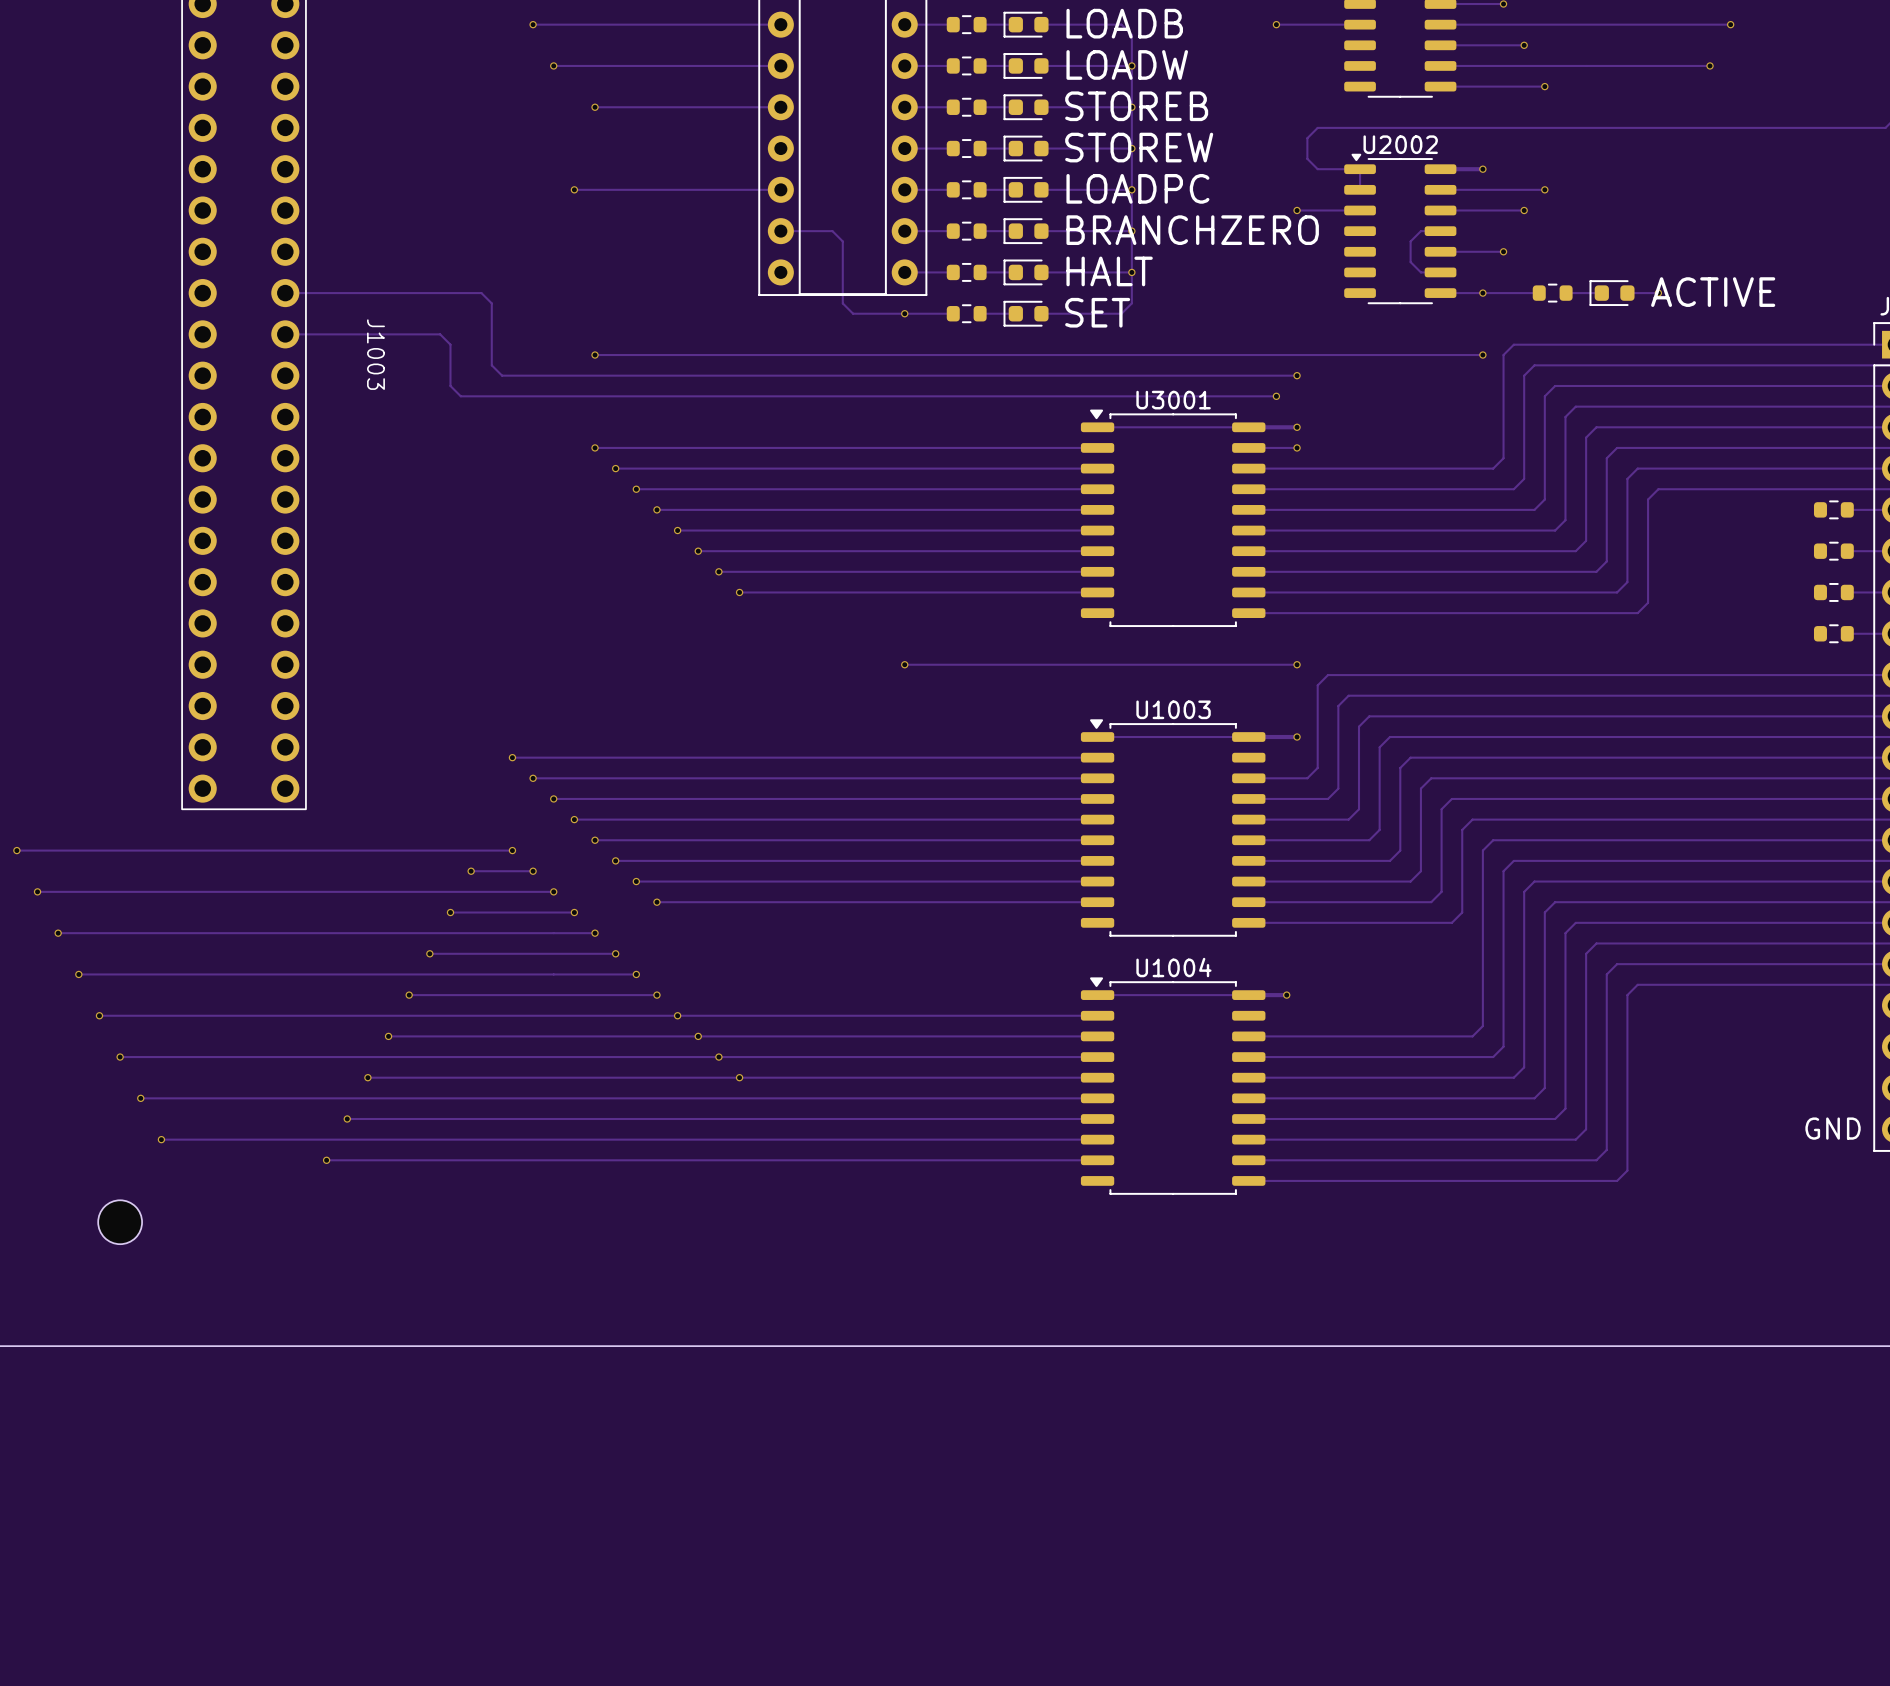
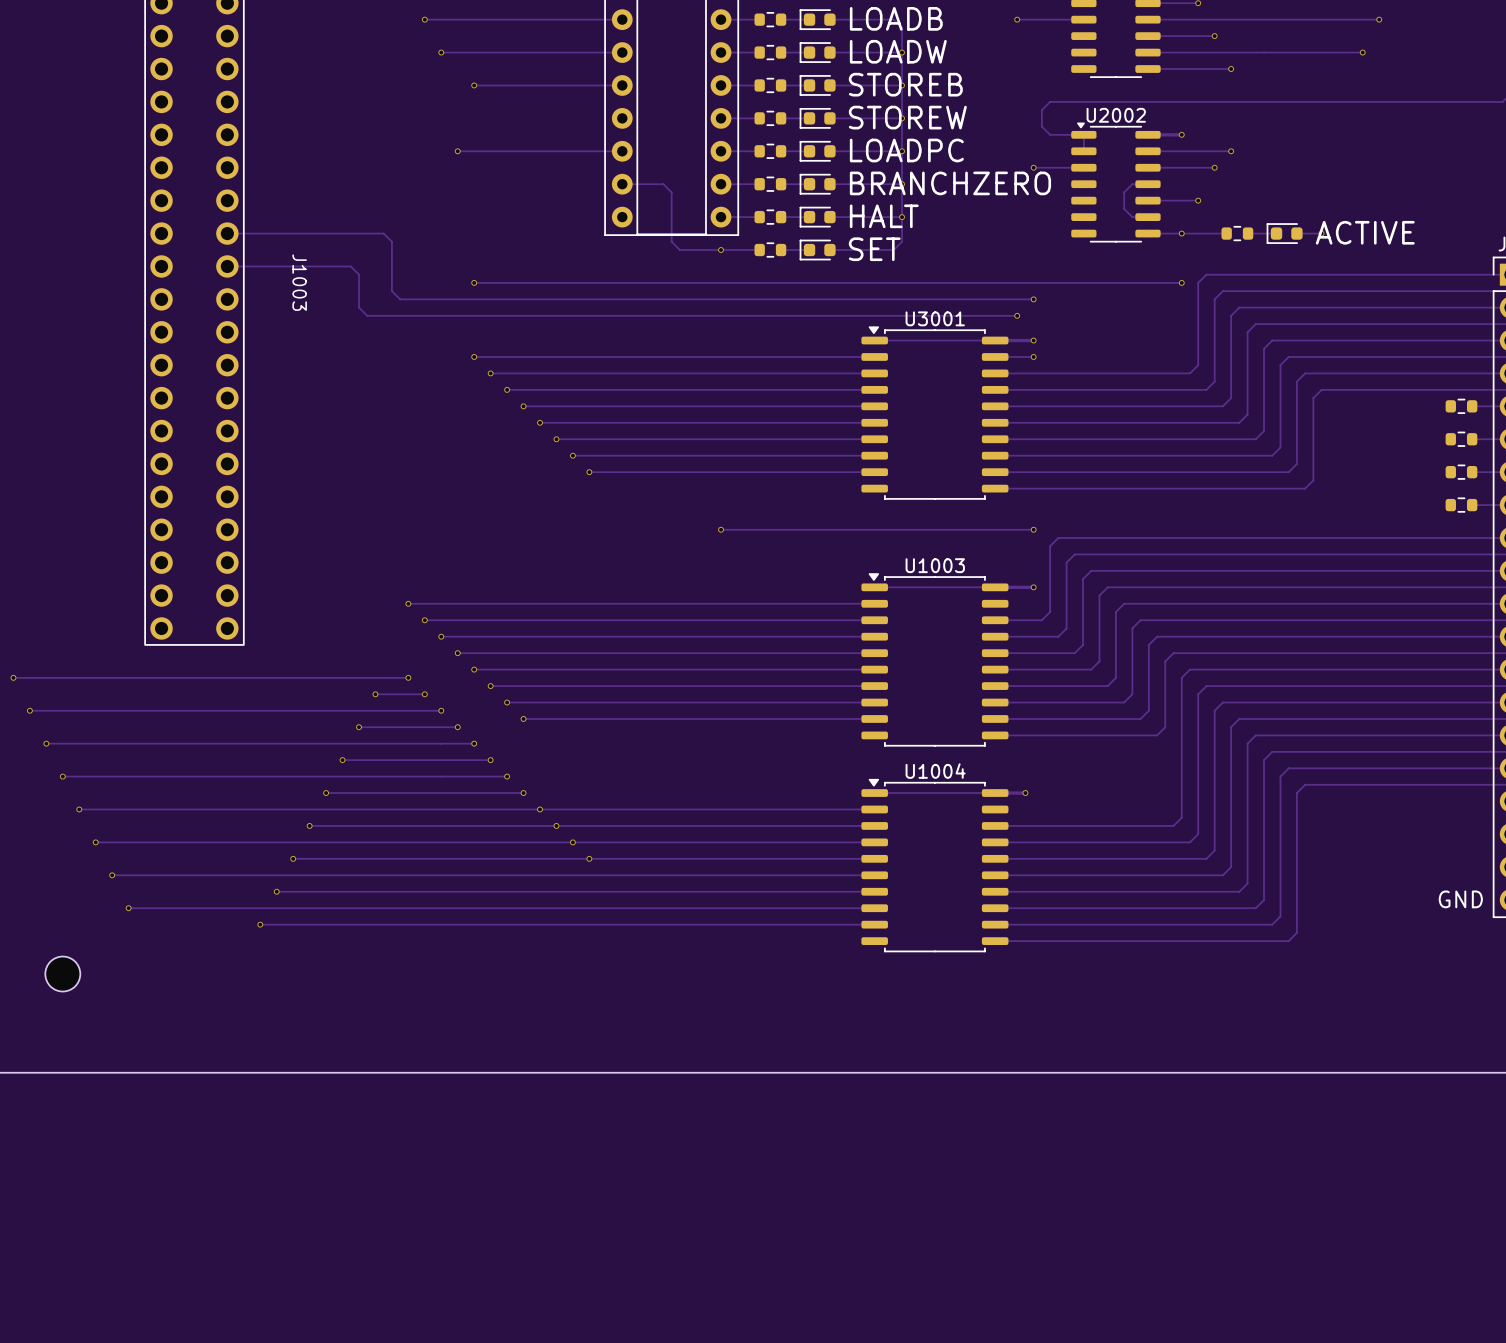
part position: (120, 1222) -> (62, 974)

